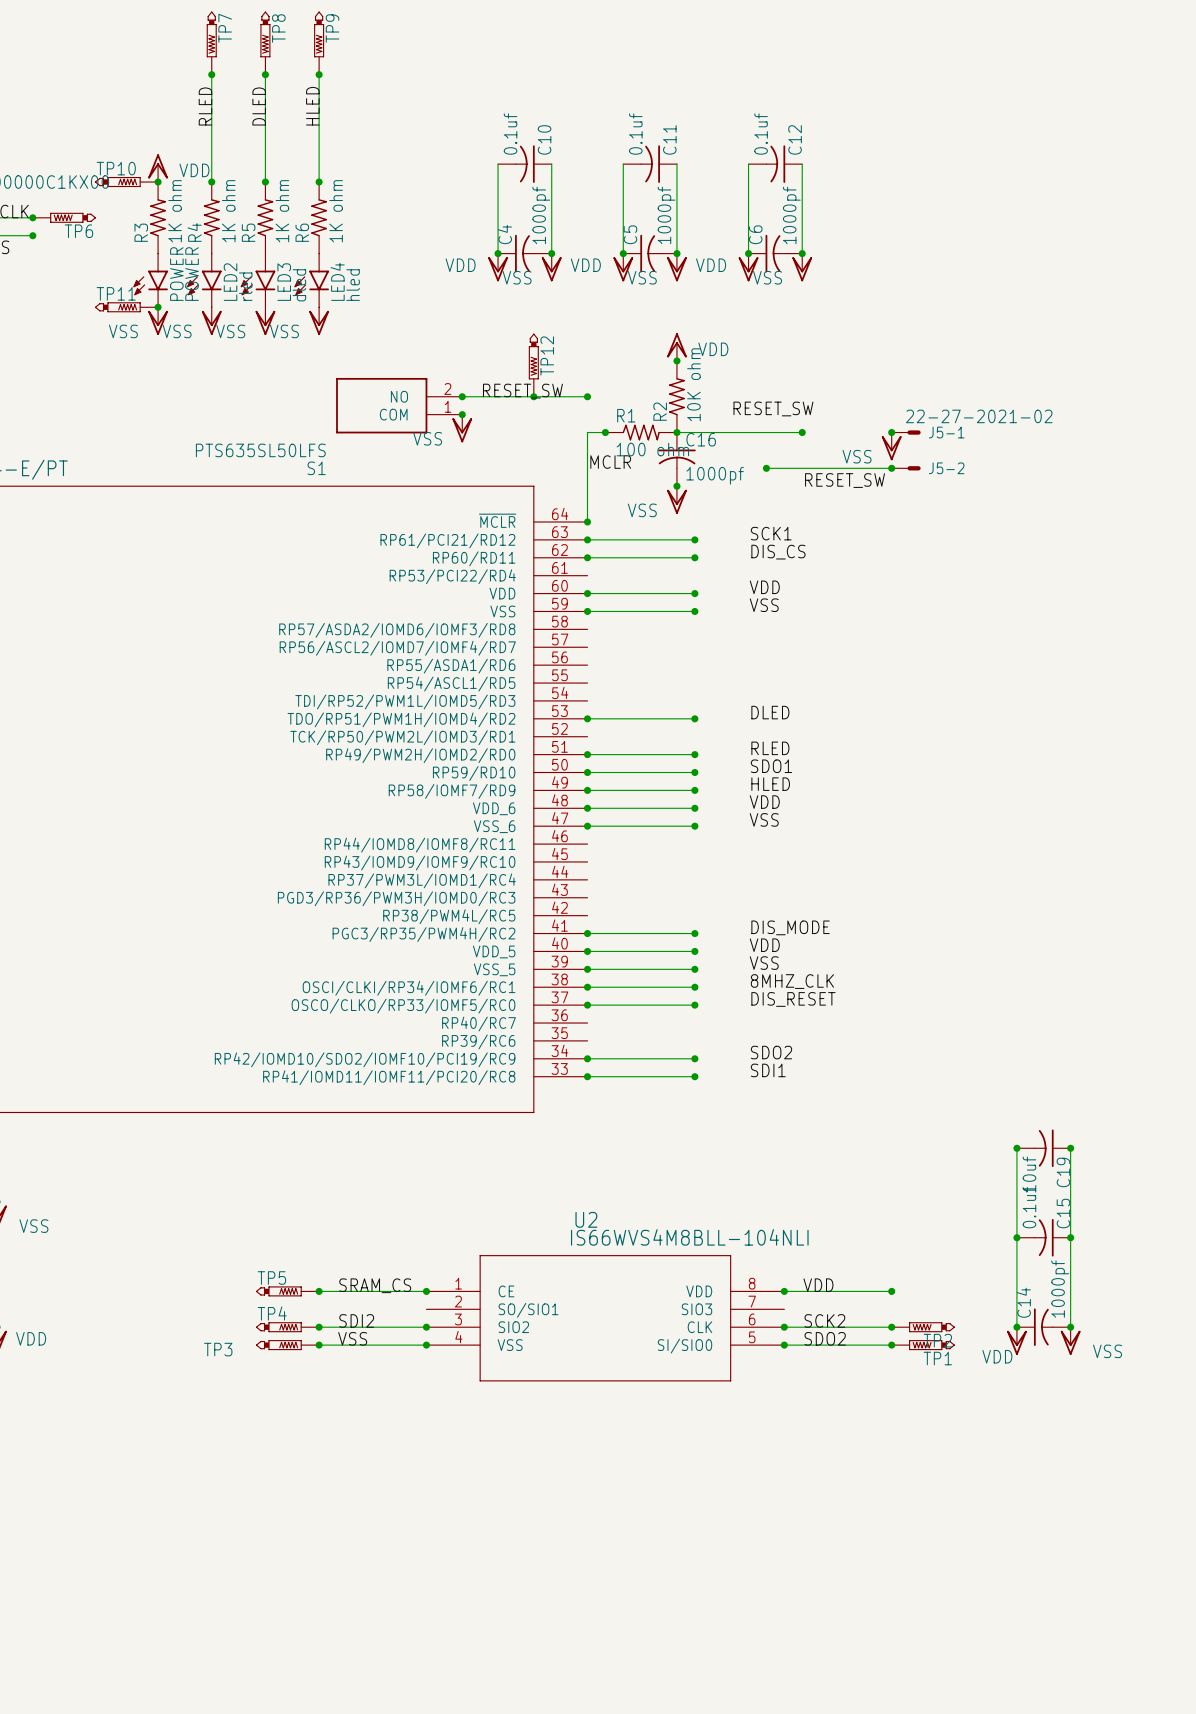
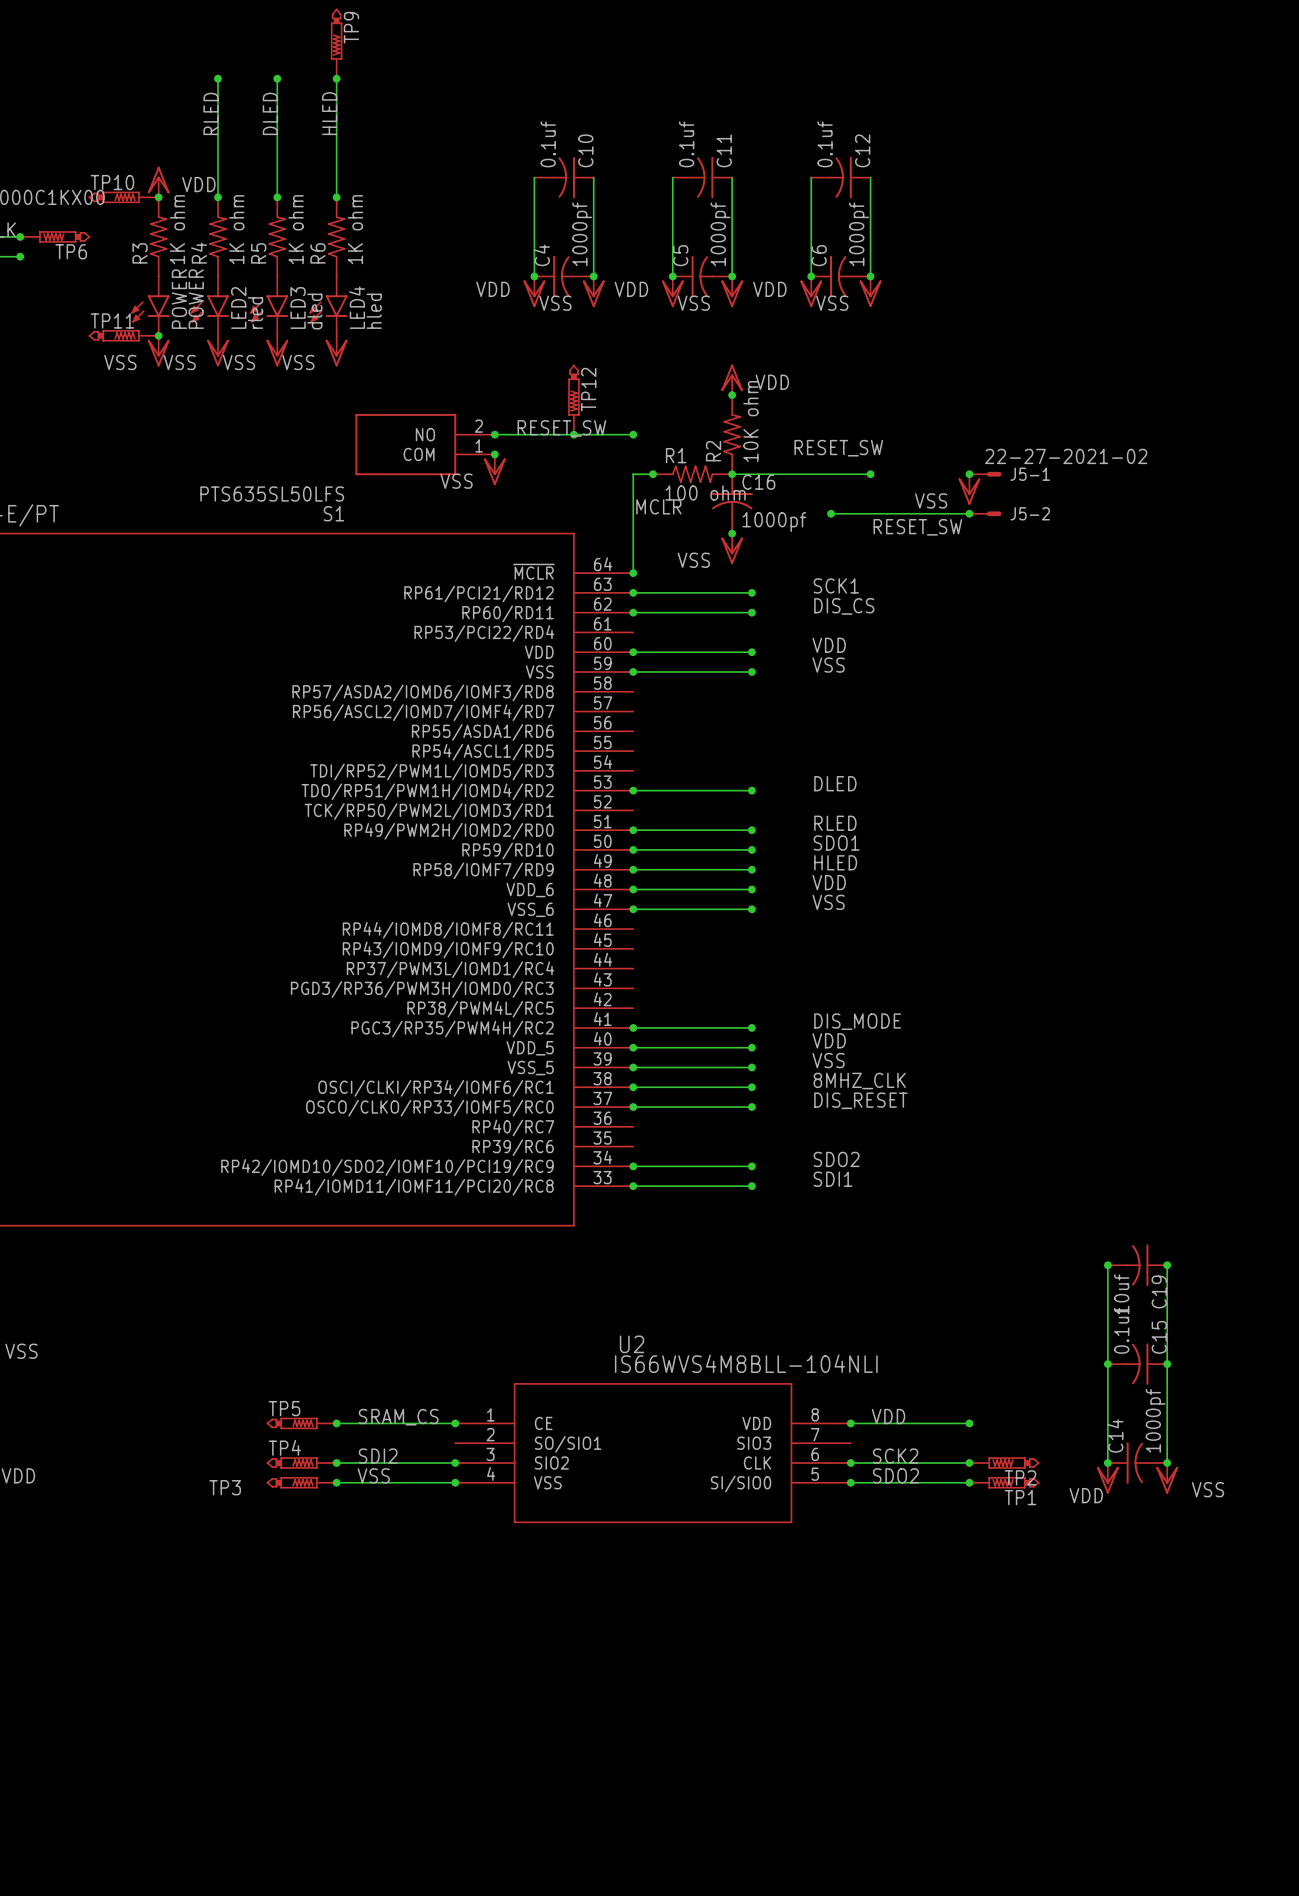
TP7: (211, 43) -> none
TP8: (265, 43) -> none

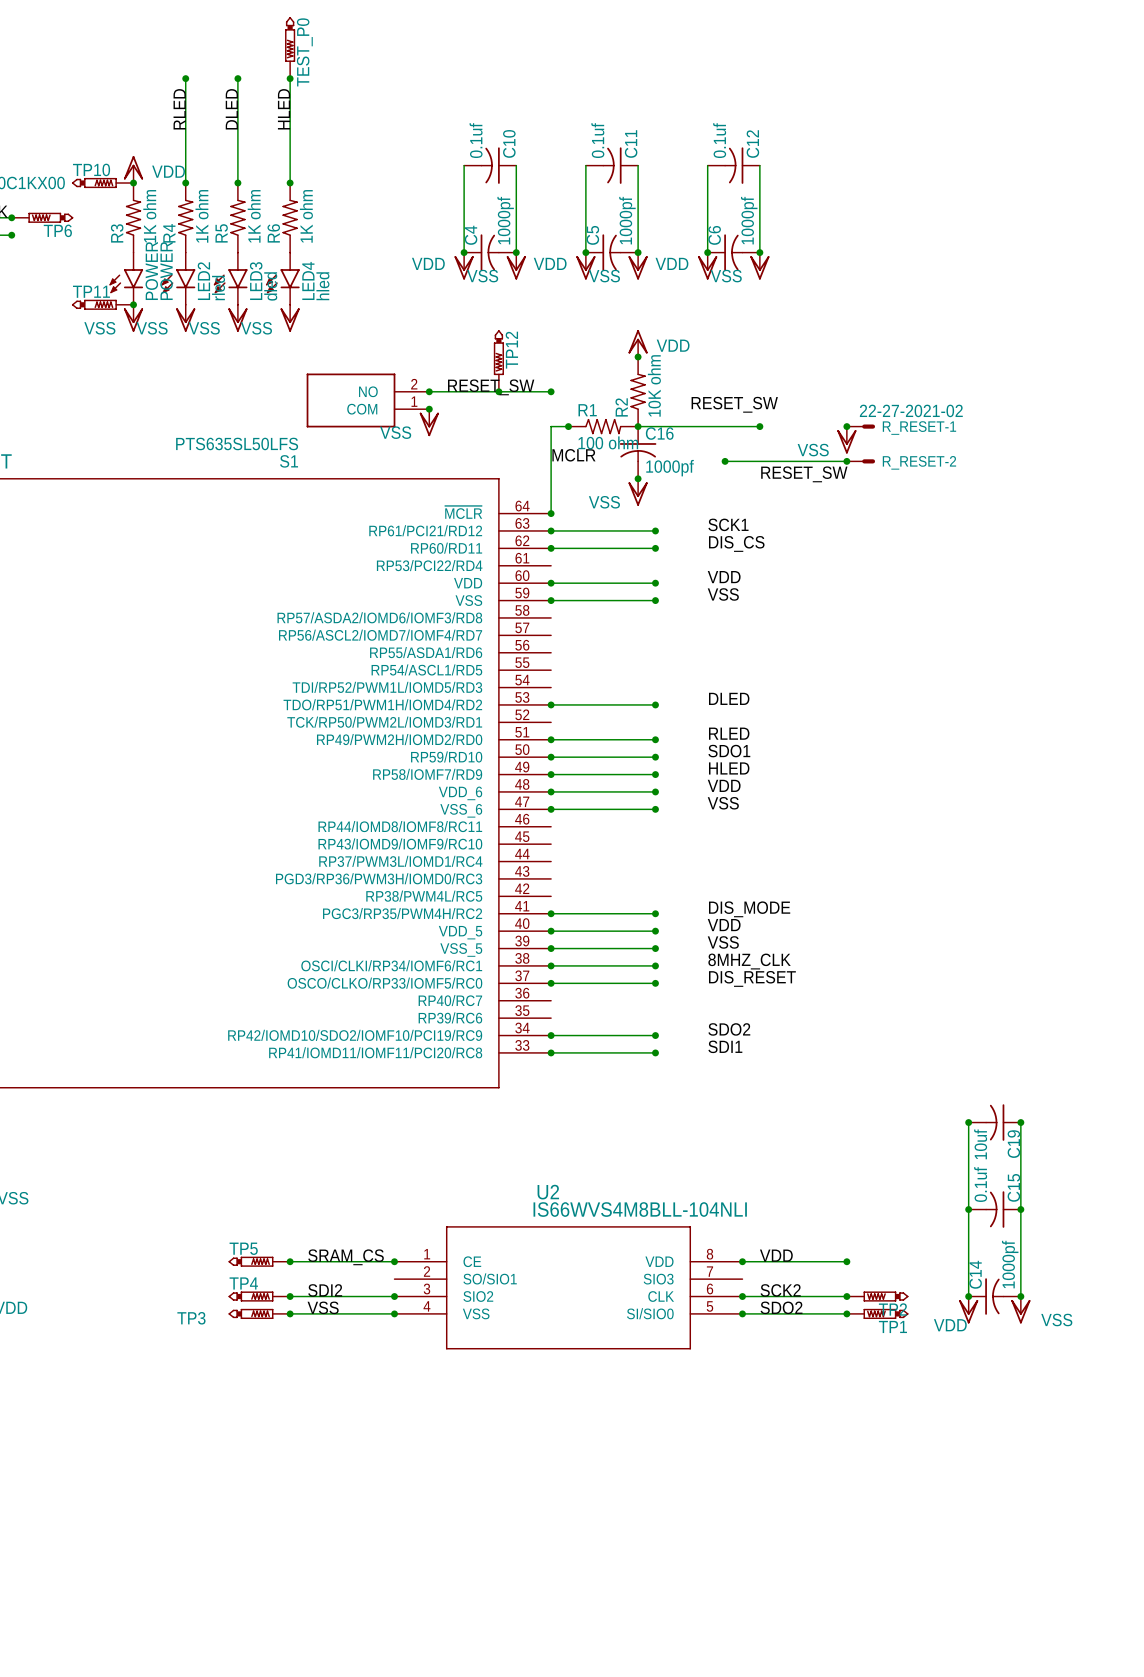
TP9 name: TP9 (351, 27) -> TEST_P0 (304, 52)
J5-1 name: J5-1 (1030, 474) -> R_RESET-1 (919, 428)
J5-2 name: J5-2 (1030, 513) -> R_RESET-2 (919, 462)

